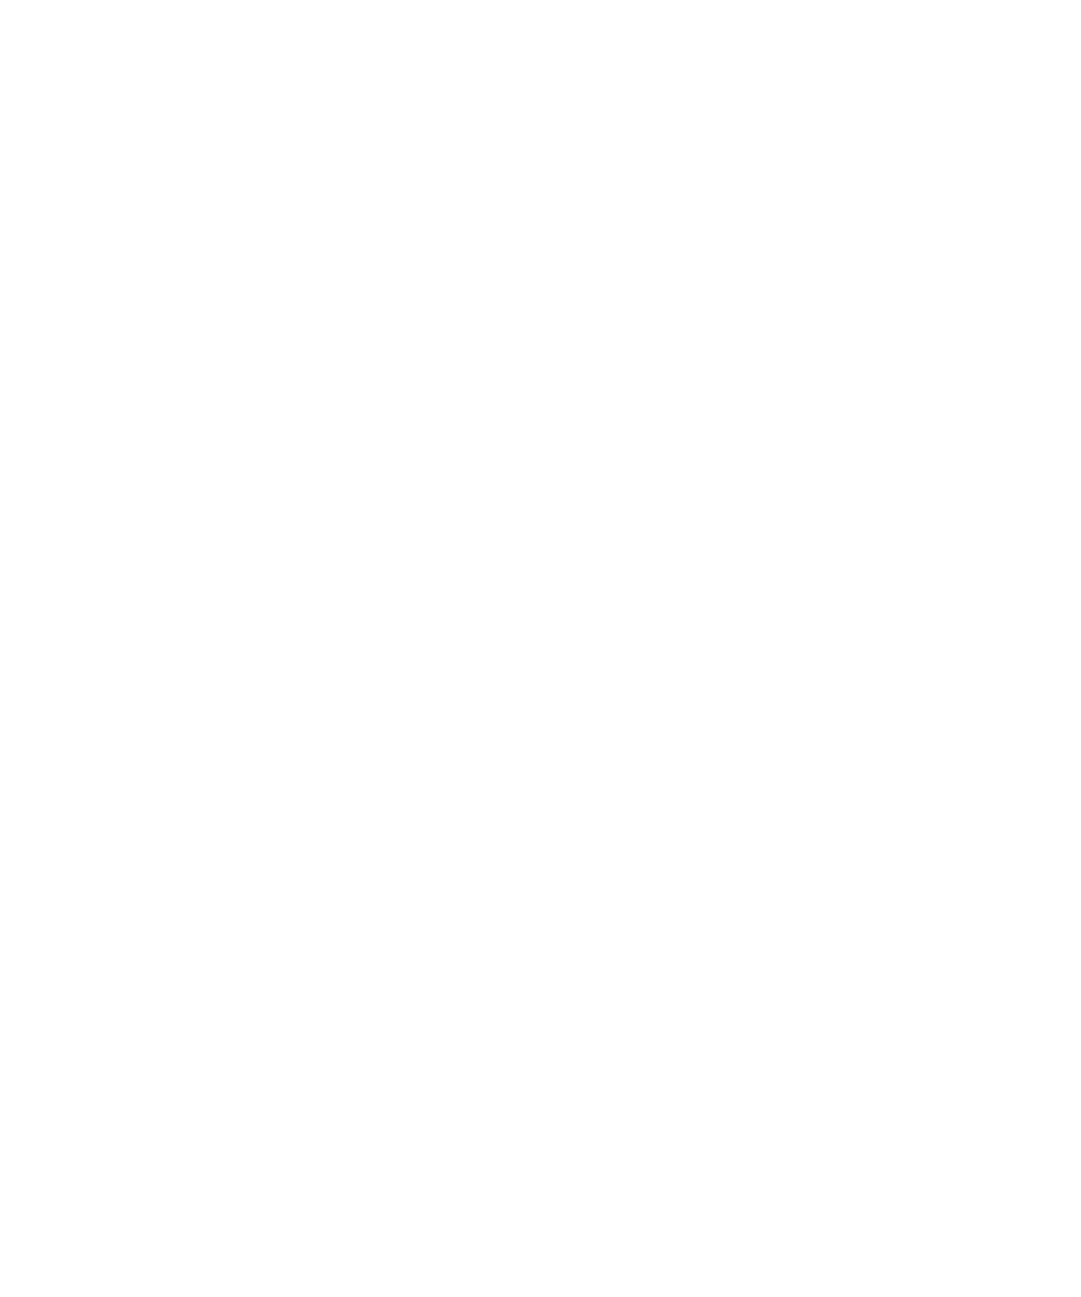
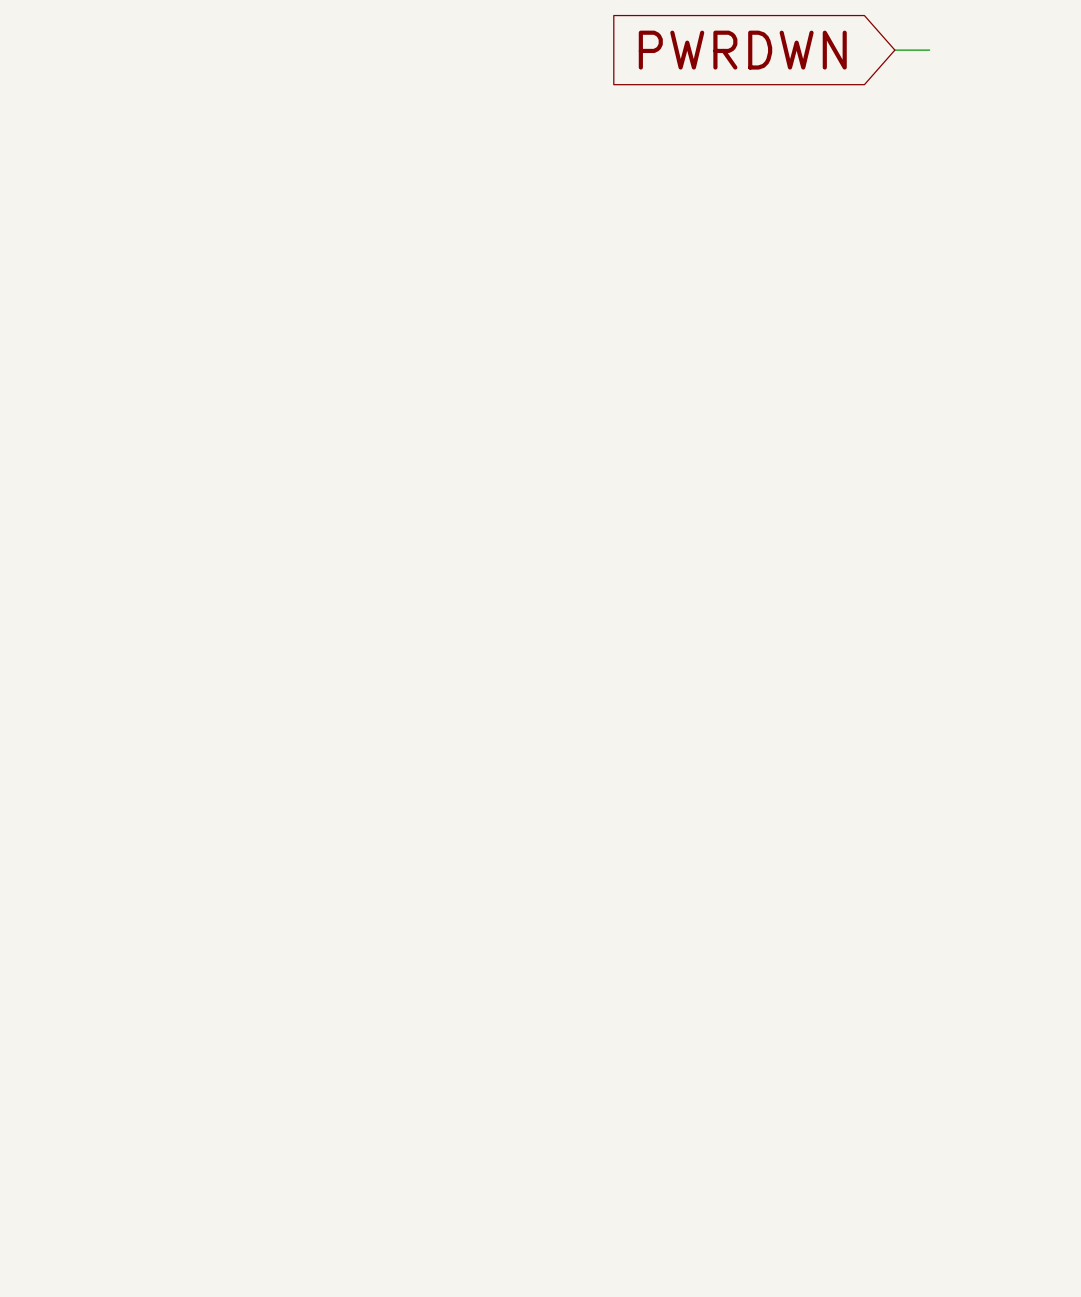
global label: none -> PWRDWN (742, 50)
wire: none -> (894, 50) (929, 50)

